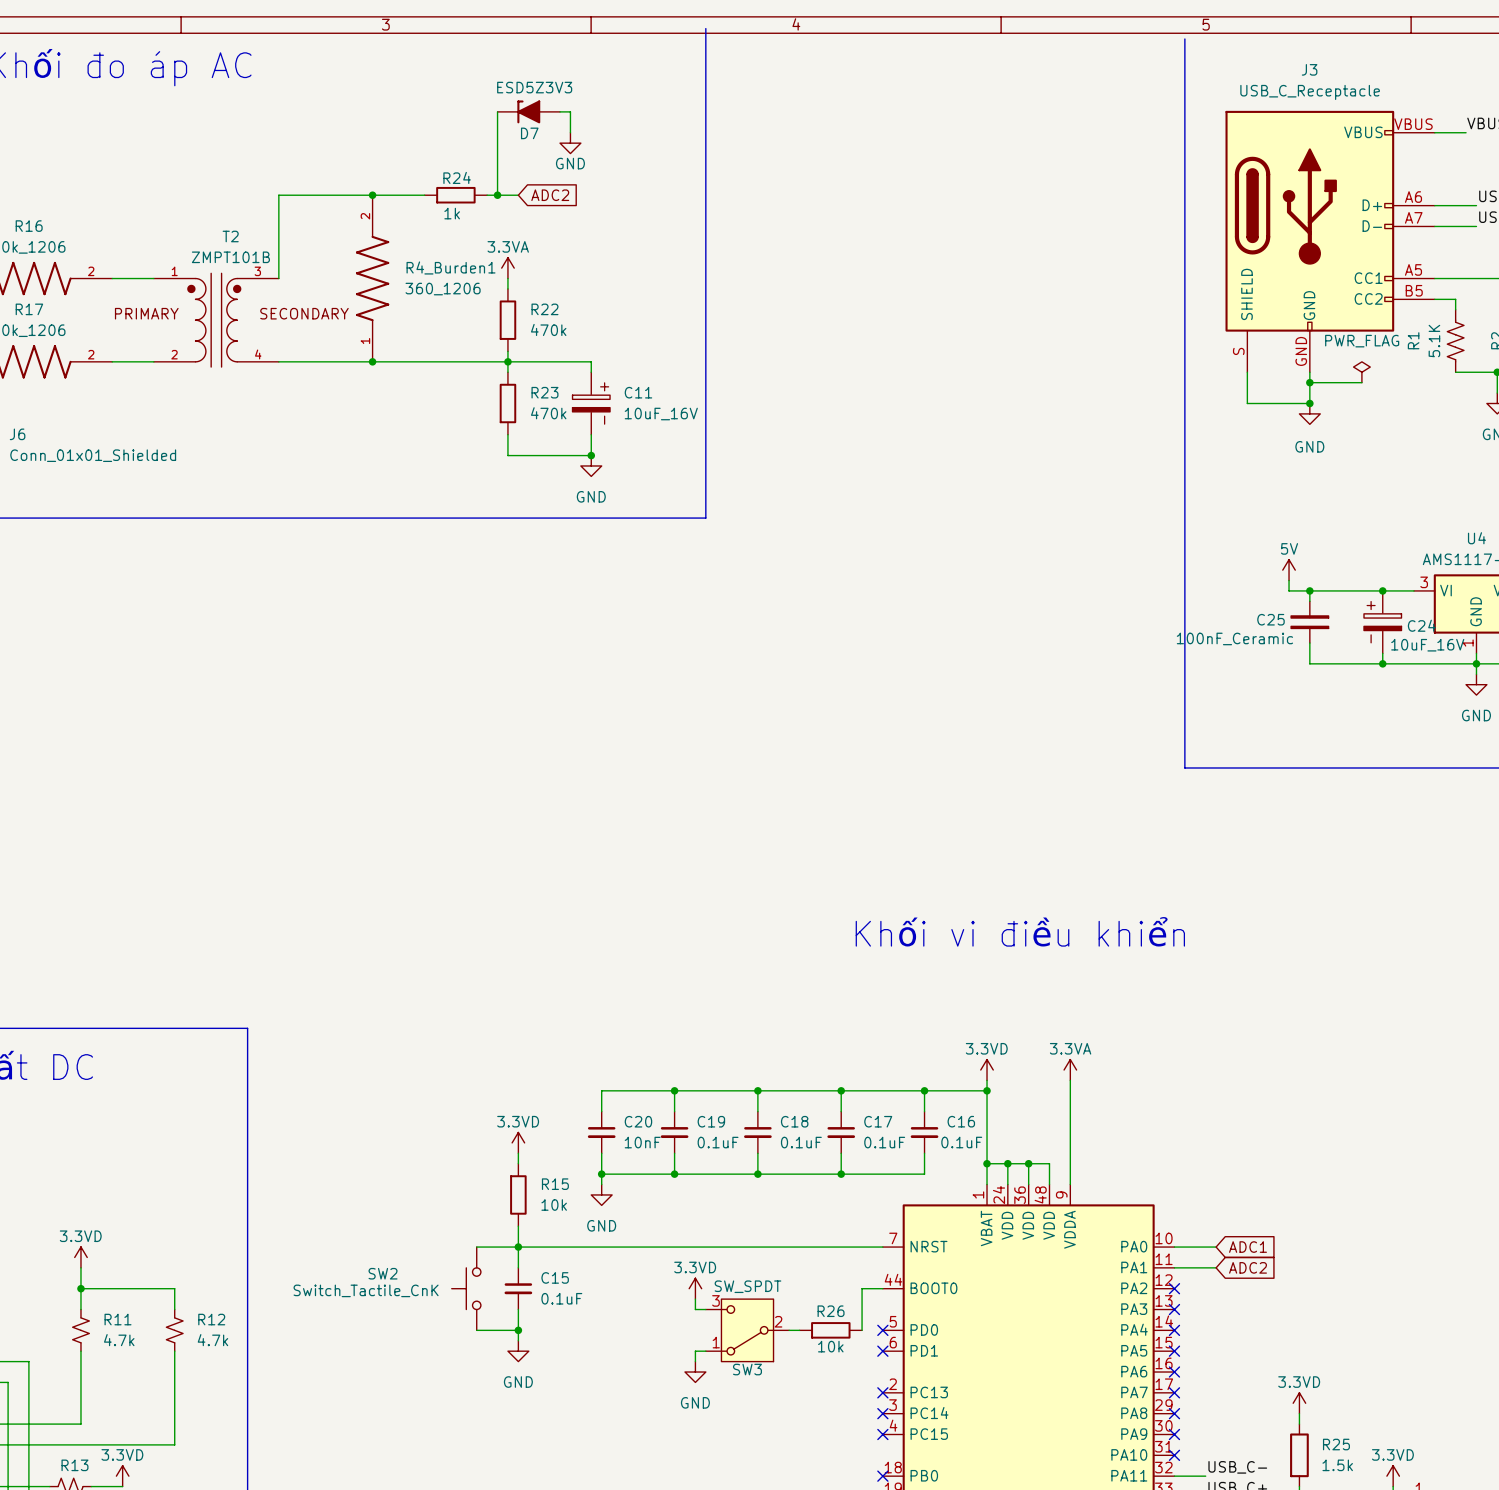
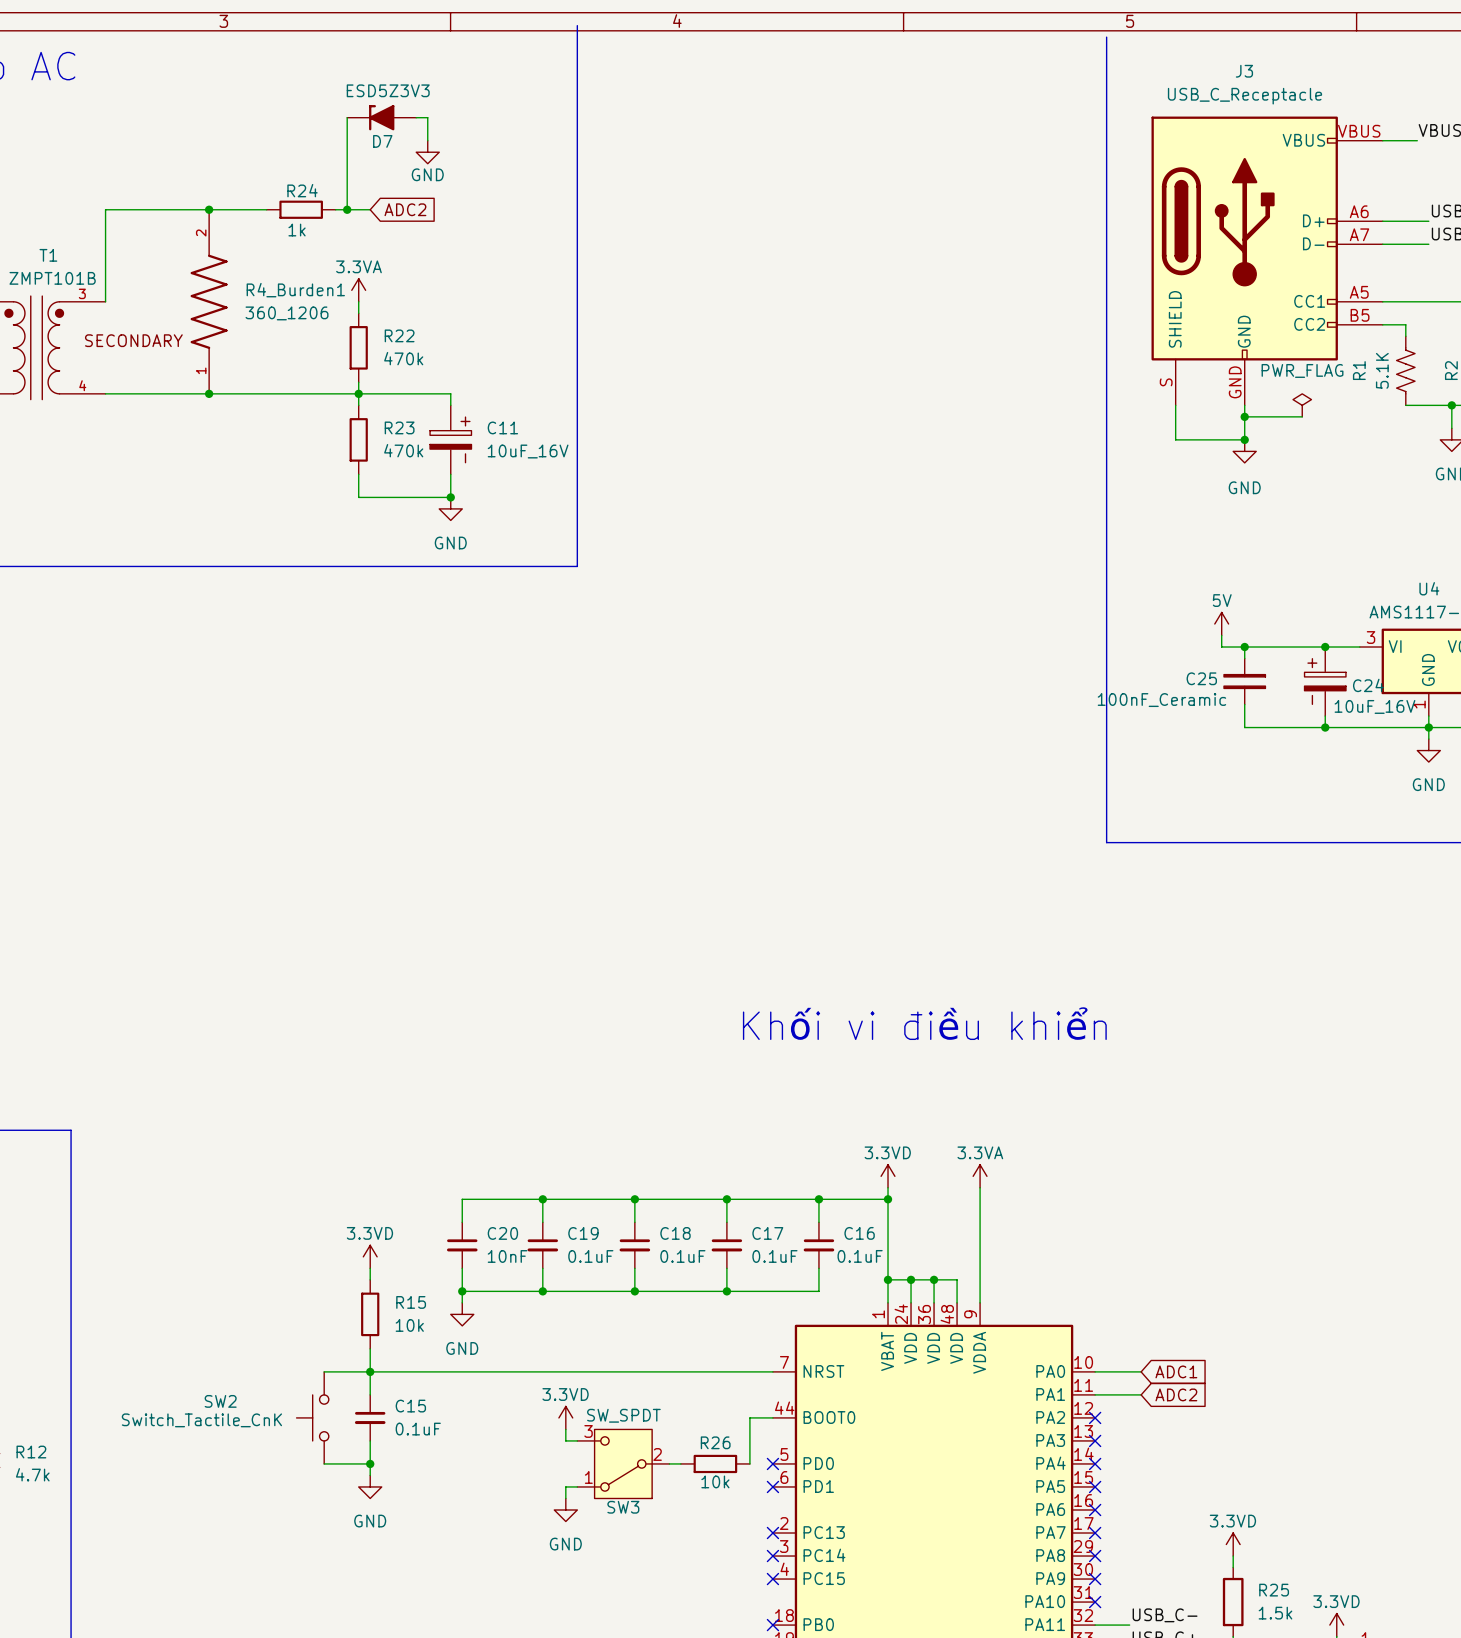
T2 name: T2 (230, 236) -> T1 (48, 255)

